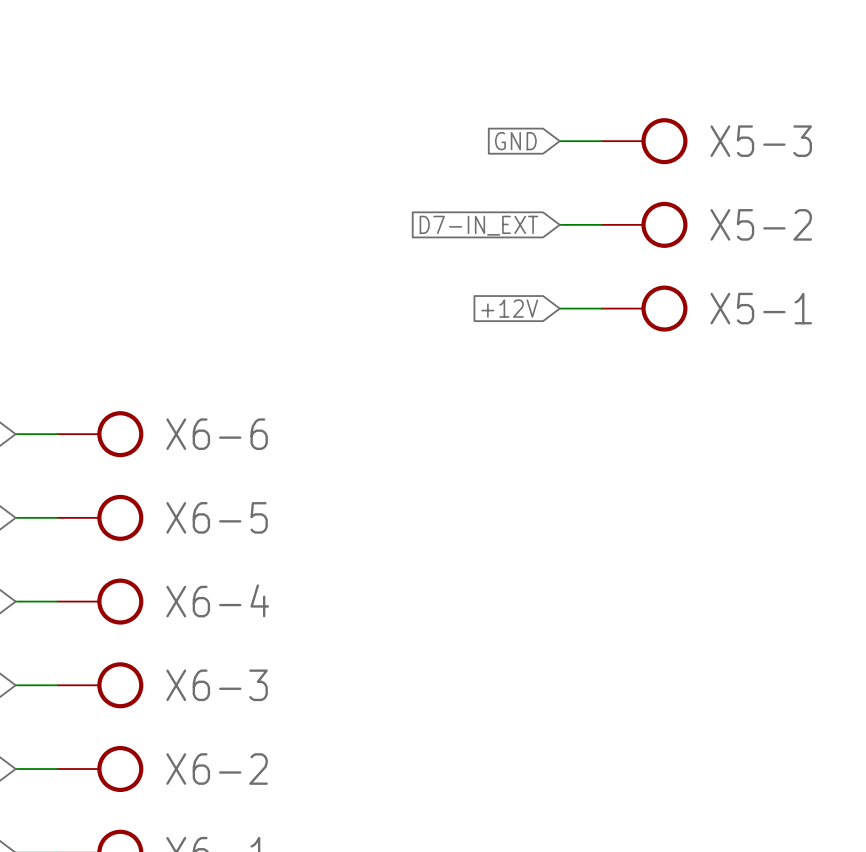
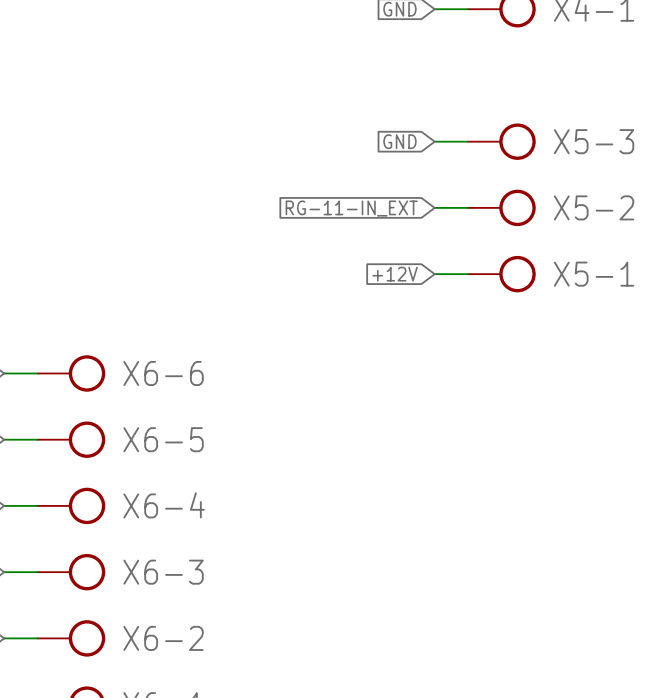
global label: D7-IN_EXT (478, 225) -> RG-11-IN_EXT (351, 208)

